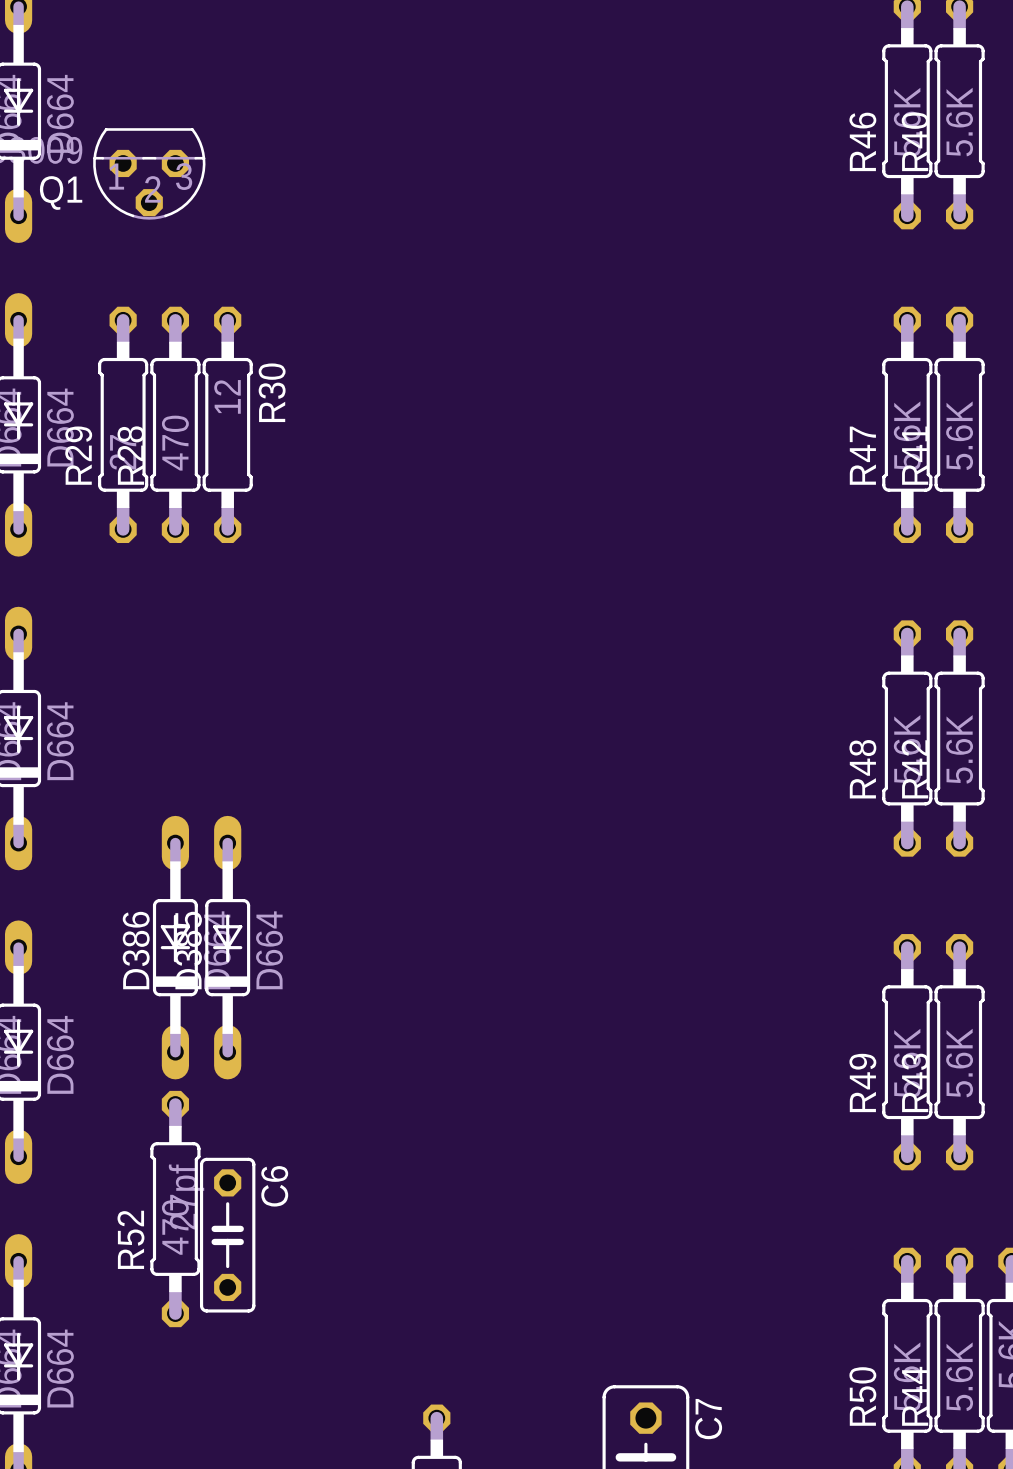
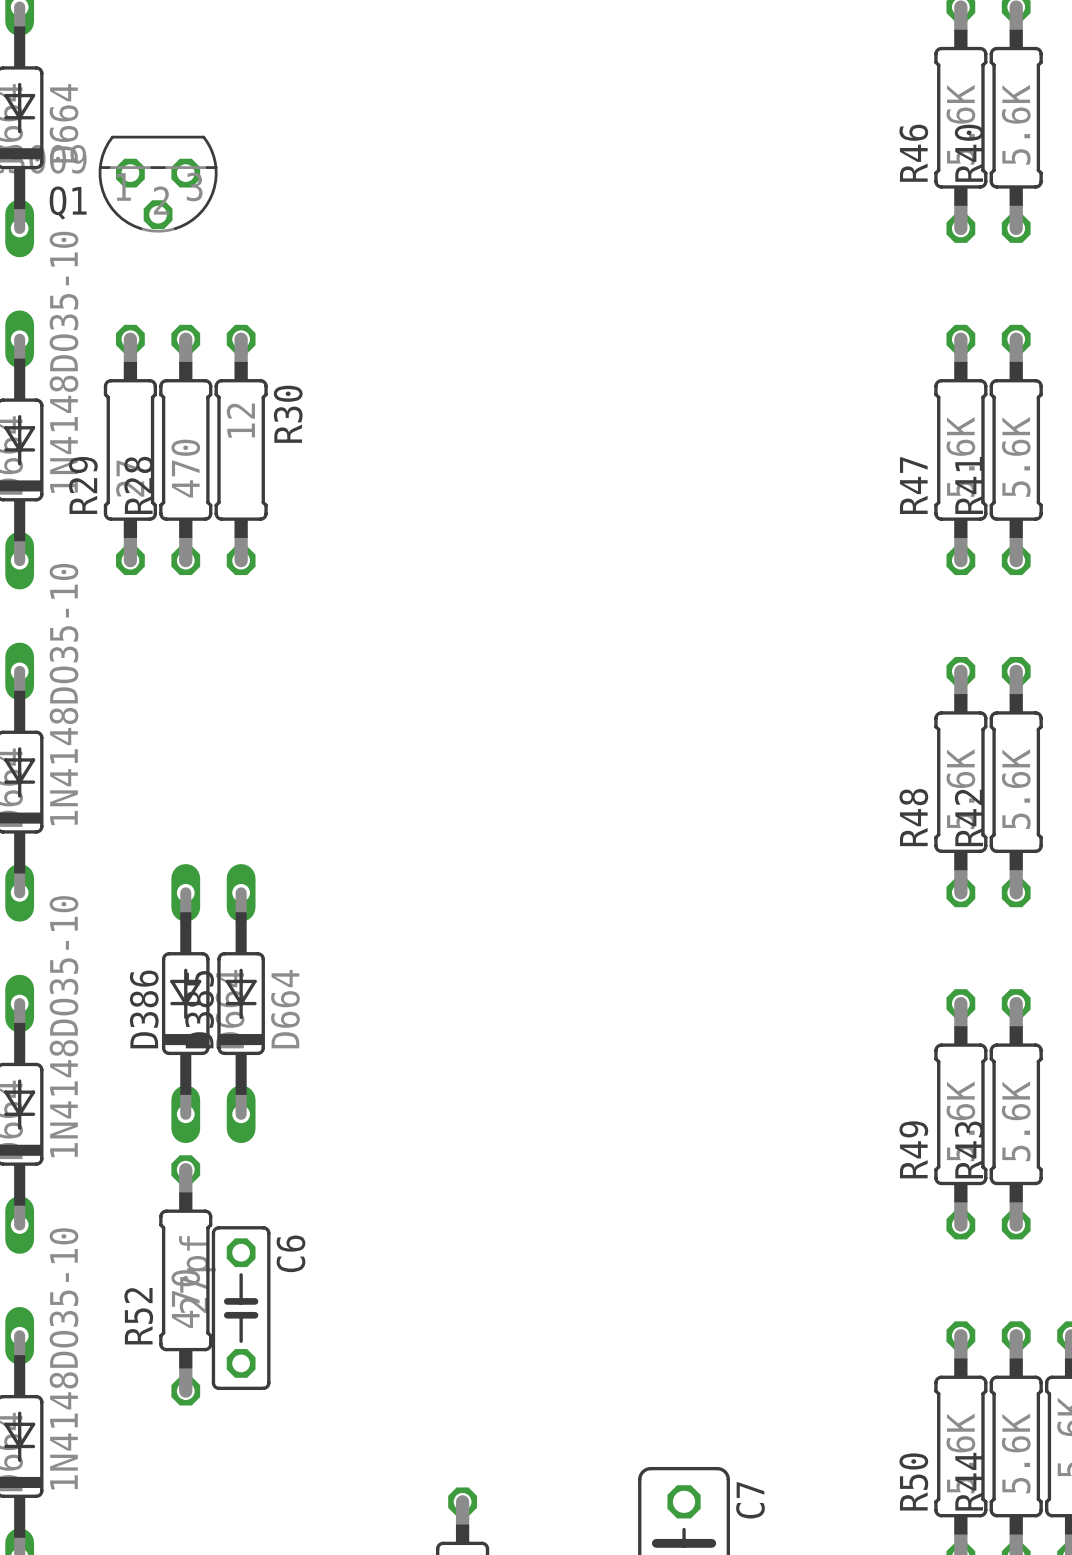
part value: D664 (60, 427) -> 1N4148DO35-10 (63, 362)
part value: D664 (60, 741) -> 1N4148DO35-10 (63, 694)
part value: D664 (60, 1054) -> 1N4148DO35-10 (63, 1026)
part value: D664 (60, 1368) -> 1N4148DO35-10 (63, 1358)

